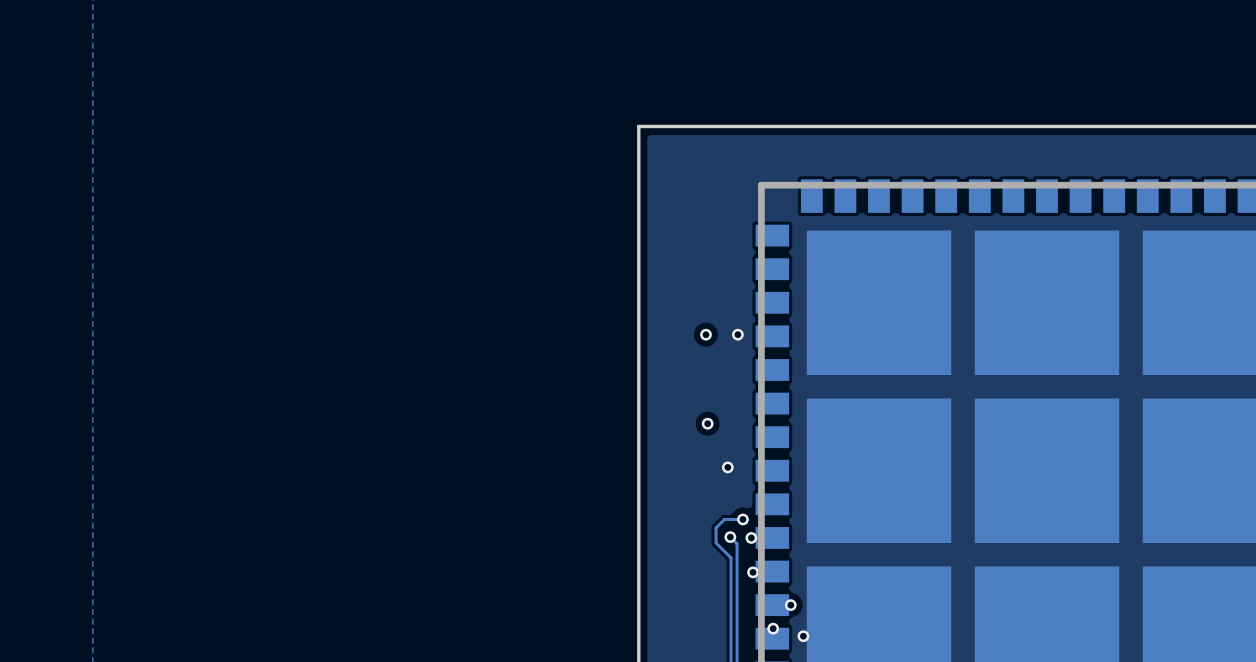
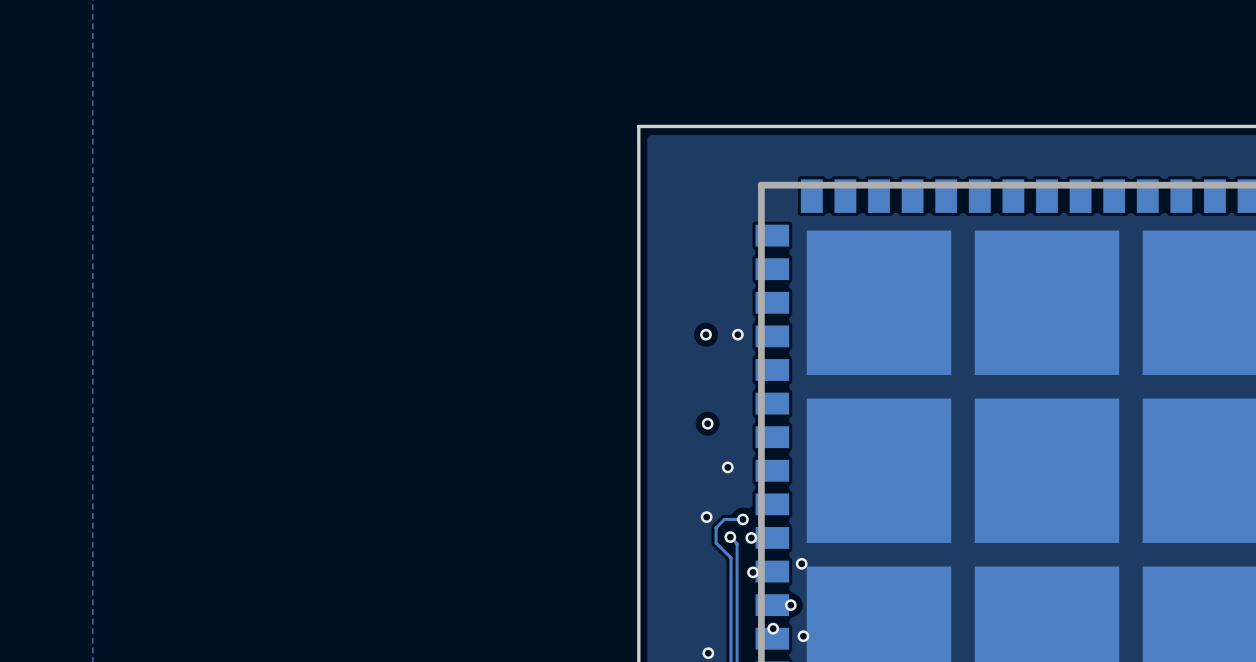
via: none -> (706, 517)
via: none -> (801, 563)
via: none -> (708, 653)

